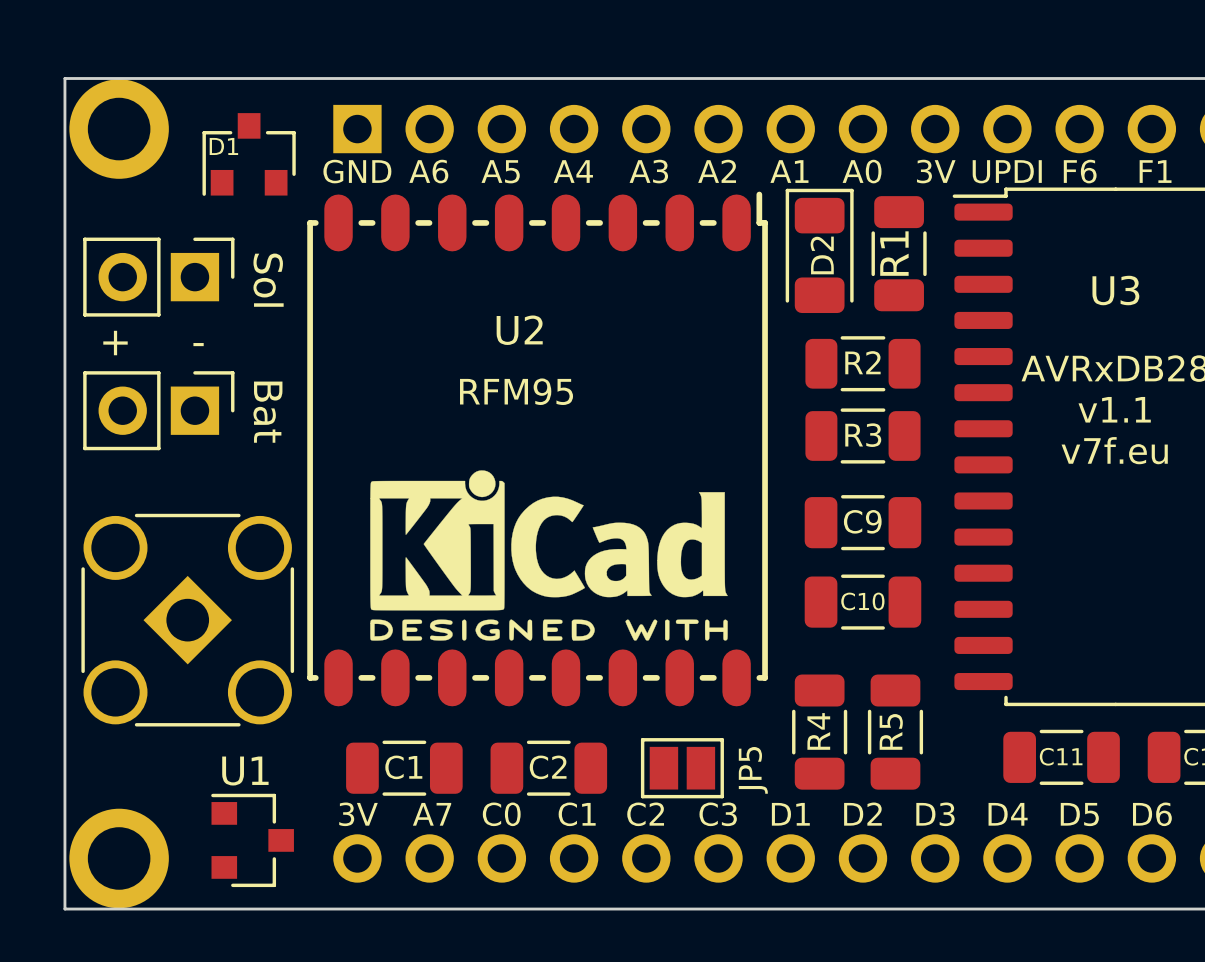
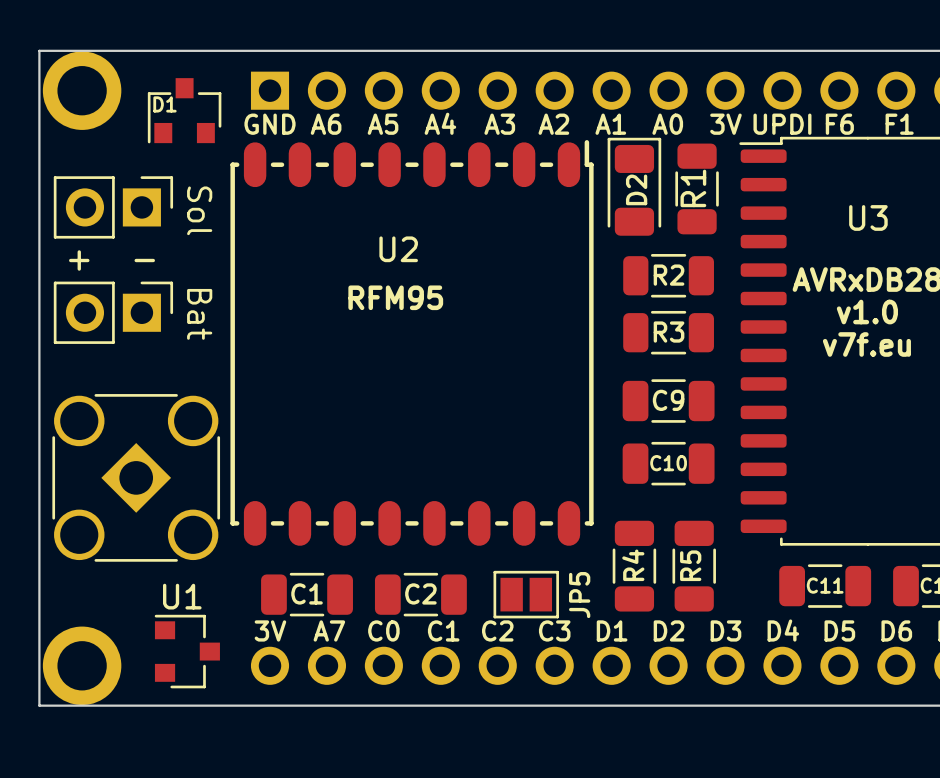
text: v1.1 (1114, 409) -> v1.0 (867, 312)
drawing: [370, 470, 728, 641] -> none

